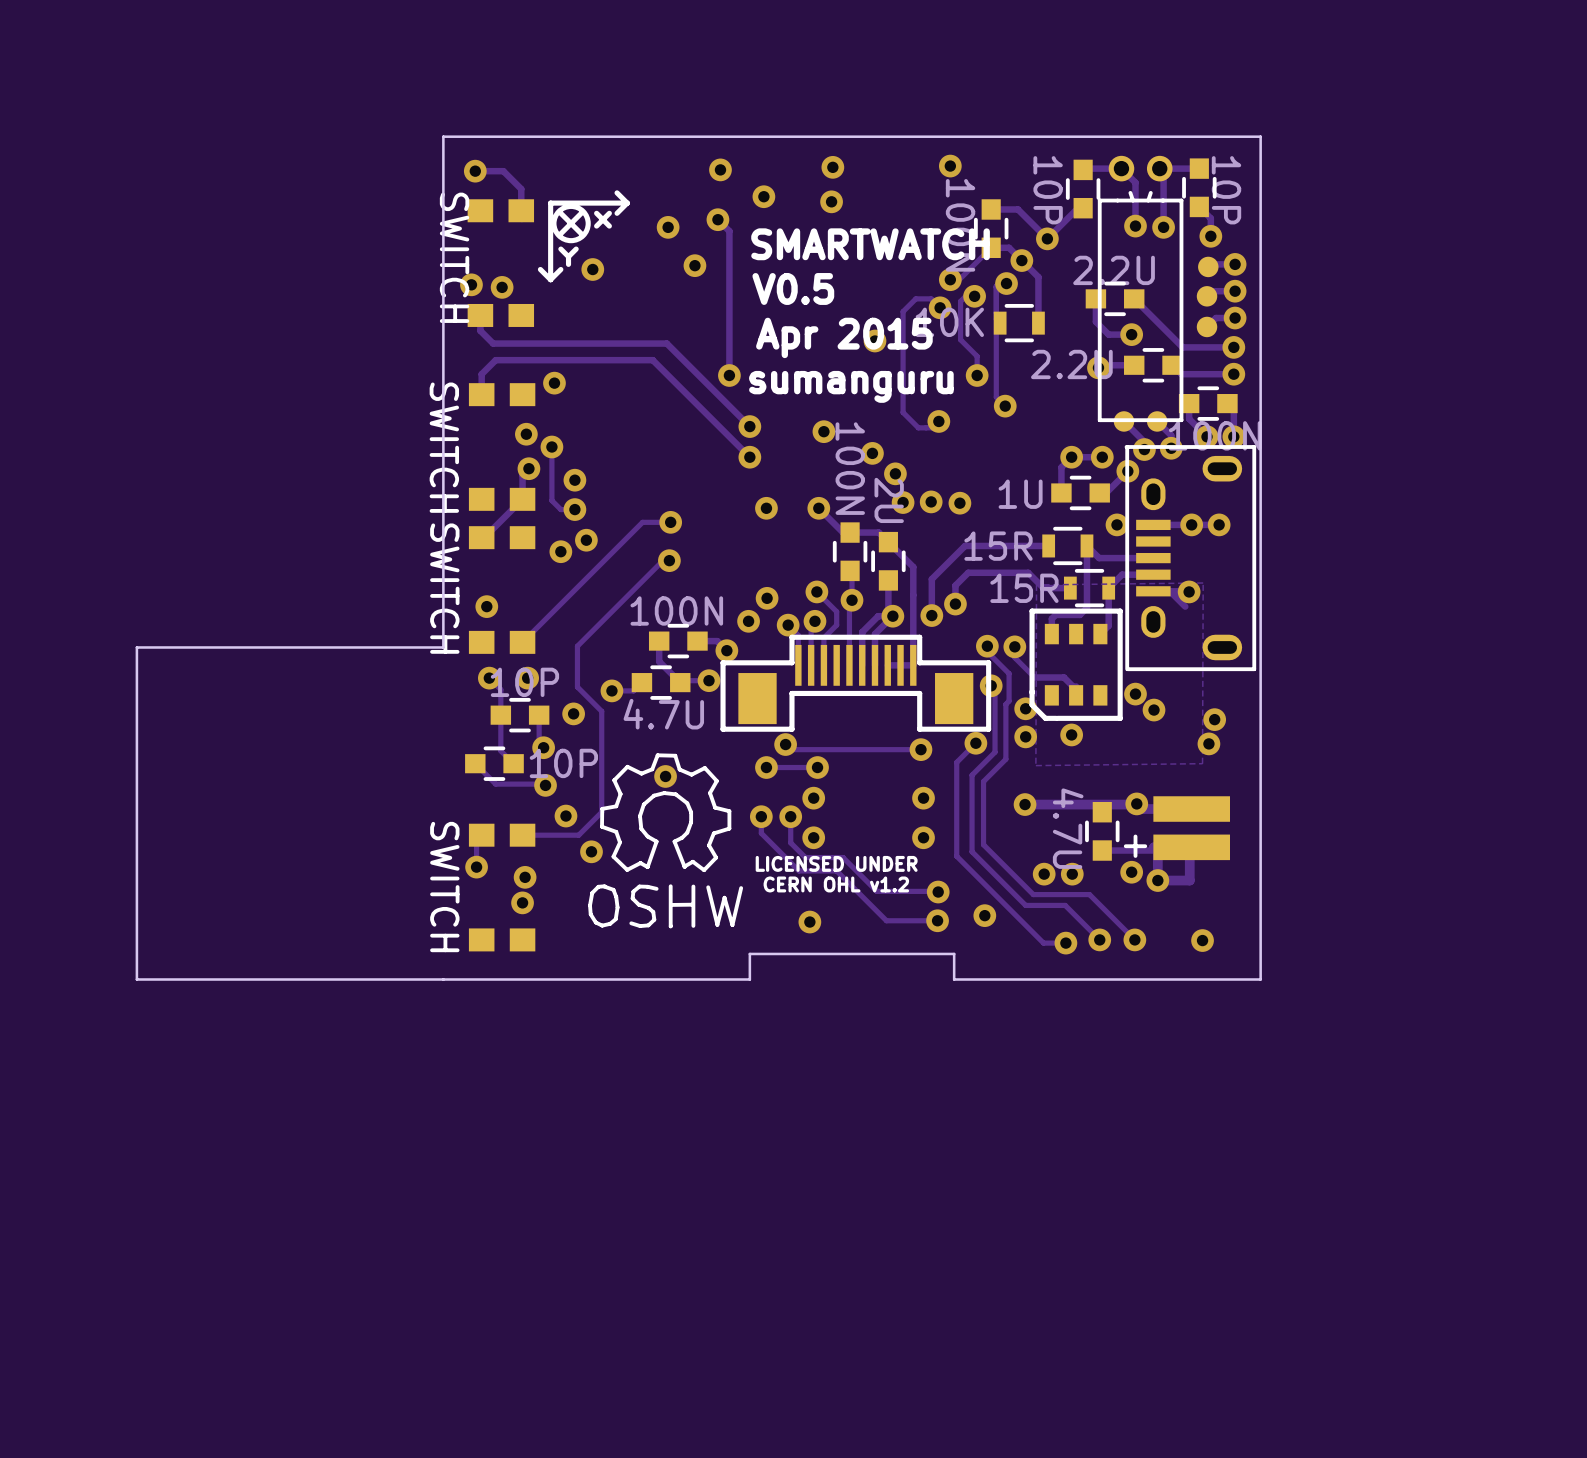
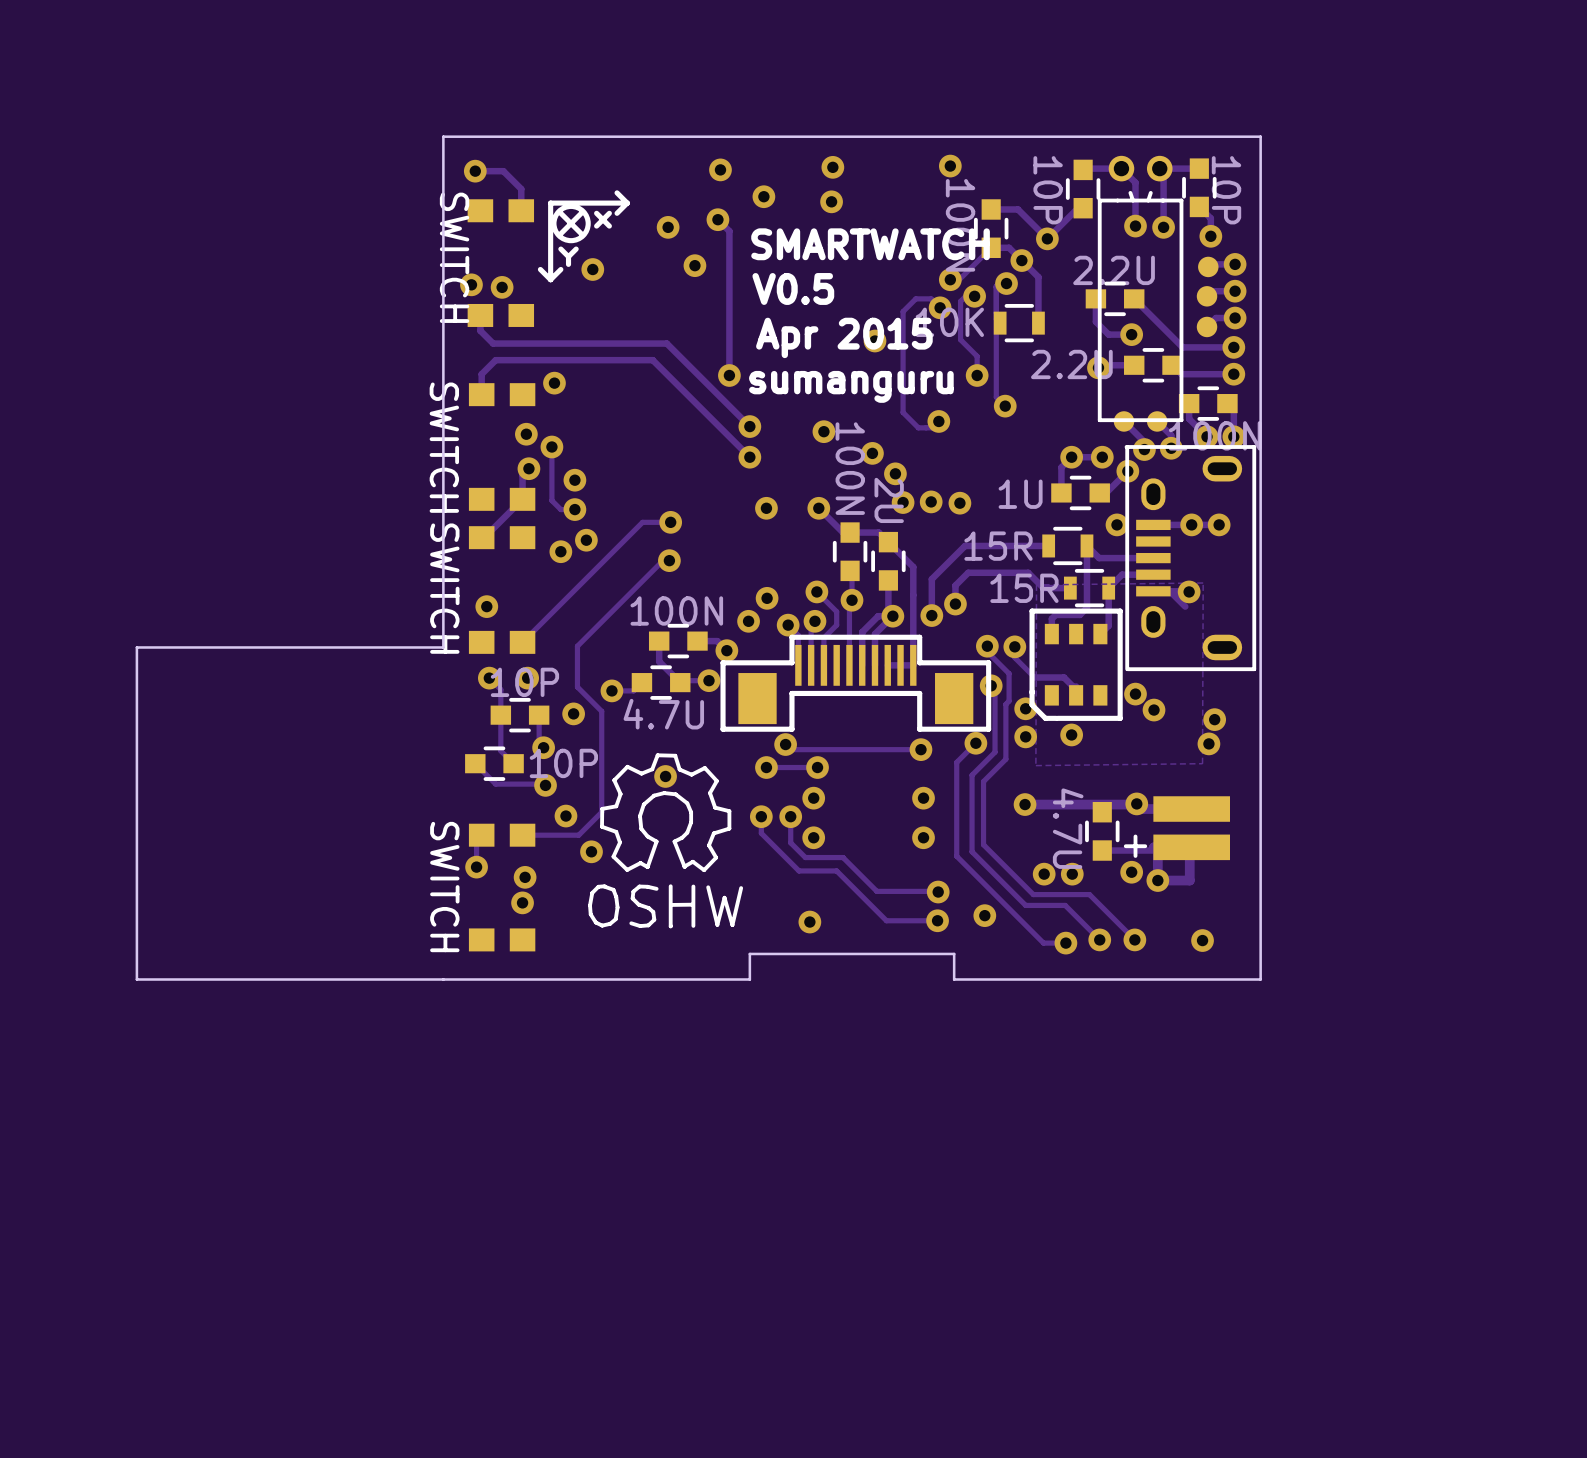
text: LICENSED UNDER (836, 863) -> none
text: CERN OHL v1.2 (836, 884) -> none

